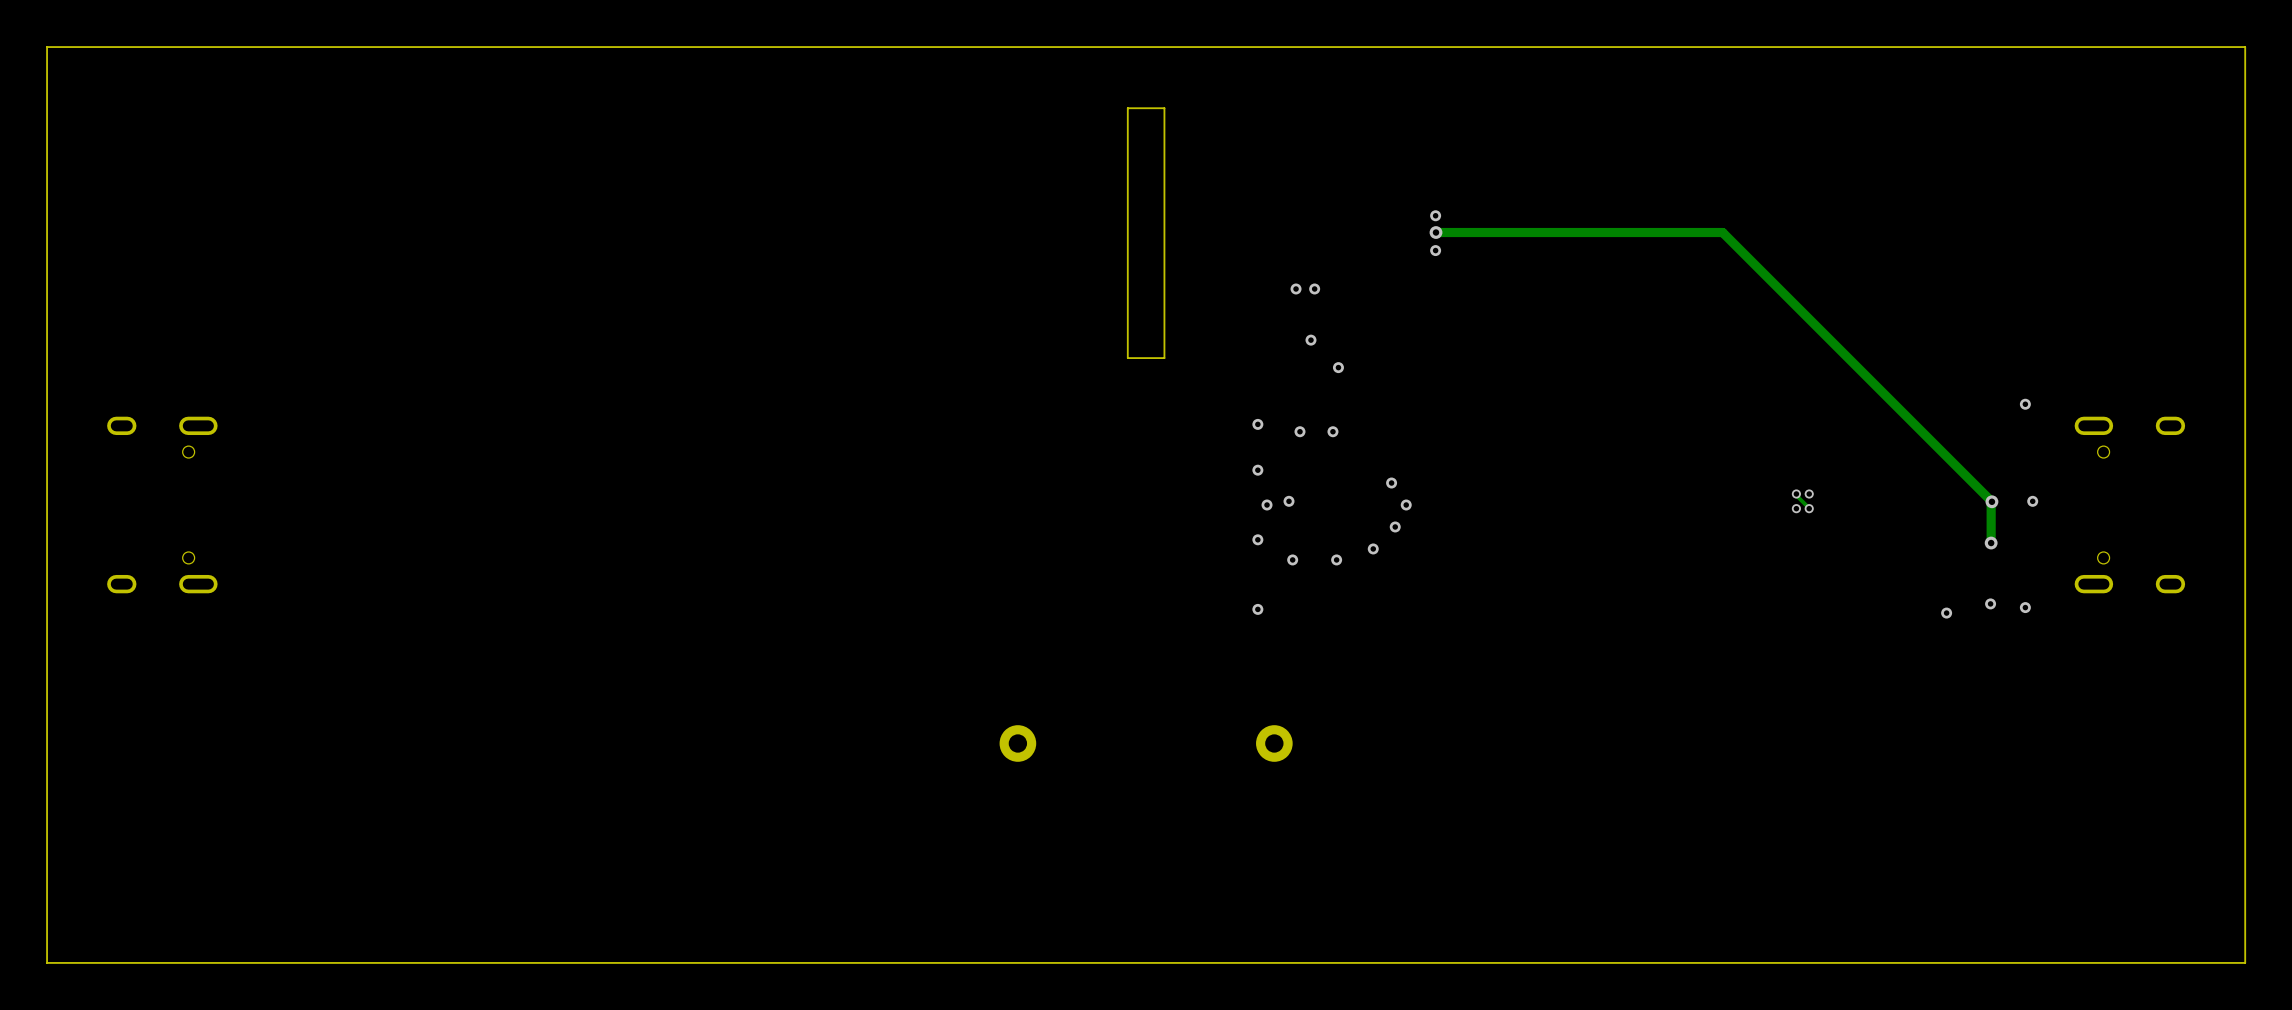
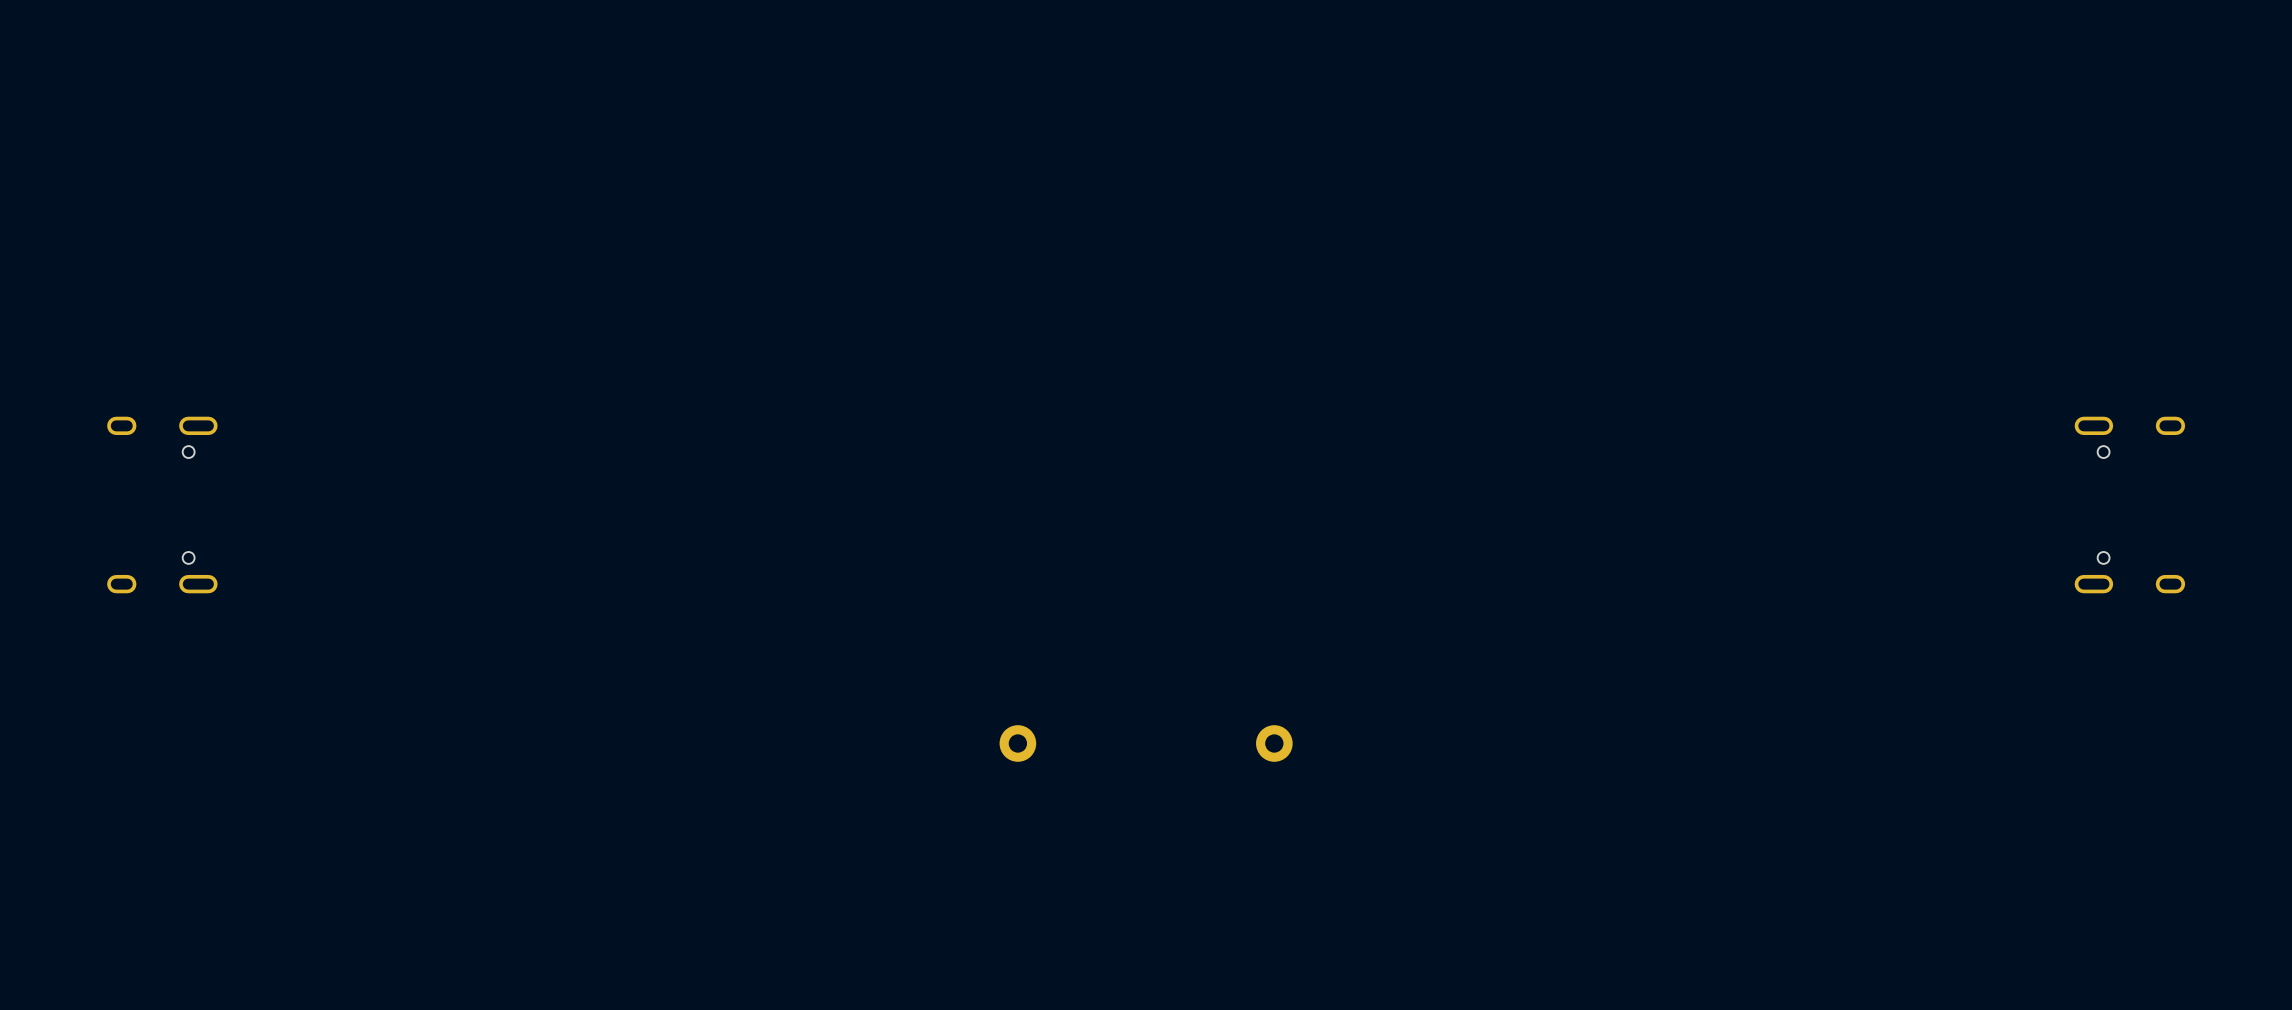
board edge: (2245, 47) (47, 47) (47, 962) (2245, 962) (2245, 47) -> none
board edge: (1164, 108) (1127, 108) (1127, 358) (1164, 358) (1164, 108) -> none
via: (1435, 215) -> none
track: (1436, 232) (1722, 232) (1991, 501) (1991, 543) -> none
via: (1436, 232) -> none
via: (1435, 250) -> none
via: (1296, 288) -> none
via: (1314, 288) -> none
via: (1310, 340) -> none
via: (1338, 367) -> none
via: (2025, 404) -> none
via: (1257, 424) -> none
via: (1299, 431) -> none
via: (1332, 431) -> none
via: (1257, 470) -> none
via: (1391, 483) -> none
track: (1796, 494) (1809, 508) -> none
via: (1796, 494) -> none
via: (1809, 494) -> none
via: (1289, 501) -> none
via: (1991, 501) -> none
via: (2032, 501) -> none
via: (1267, 504) -> none
via: (1406, 504) -> none
via: (1796, 508) -> none
via: (1809, 508) -> none
via: (1395, 526) -> none
via: (1257, 539) -> none
via: (1991, 543) -> none
via: (1373, 548) -> none
via: (1292, 559) -> none
via: (1336, 559) -> none
via: (1990, 603) -> none
via: (2025, 607) -> none
via: (1257, 609) -> none
via: (1946, 613) -> none

